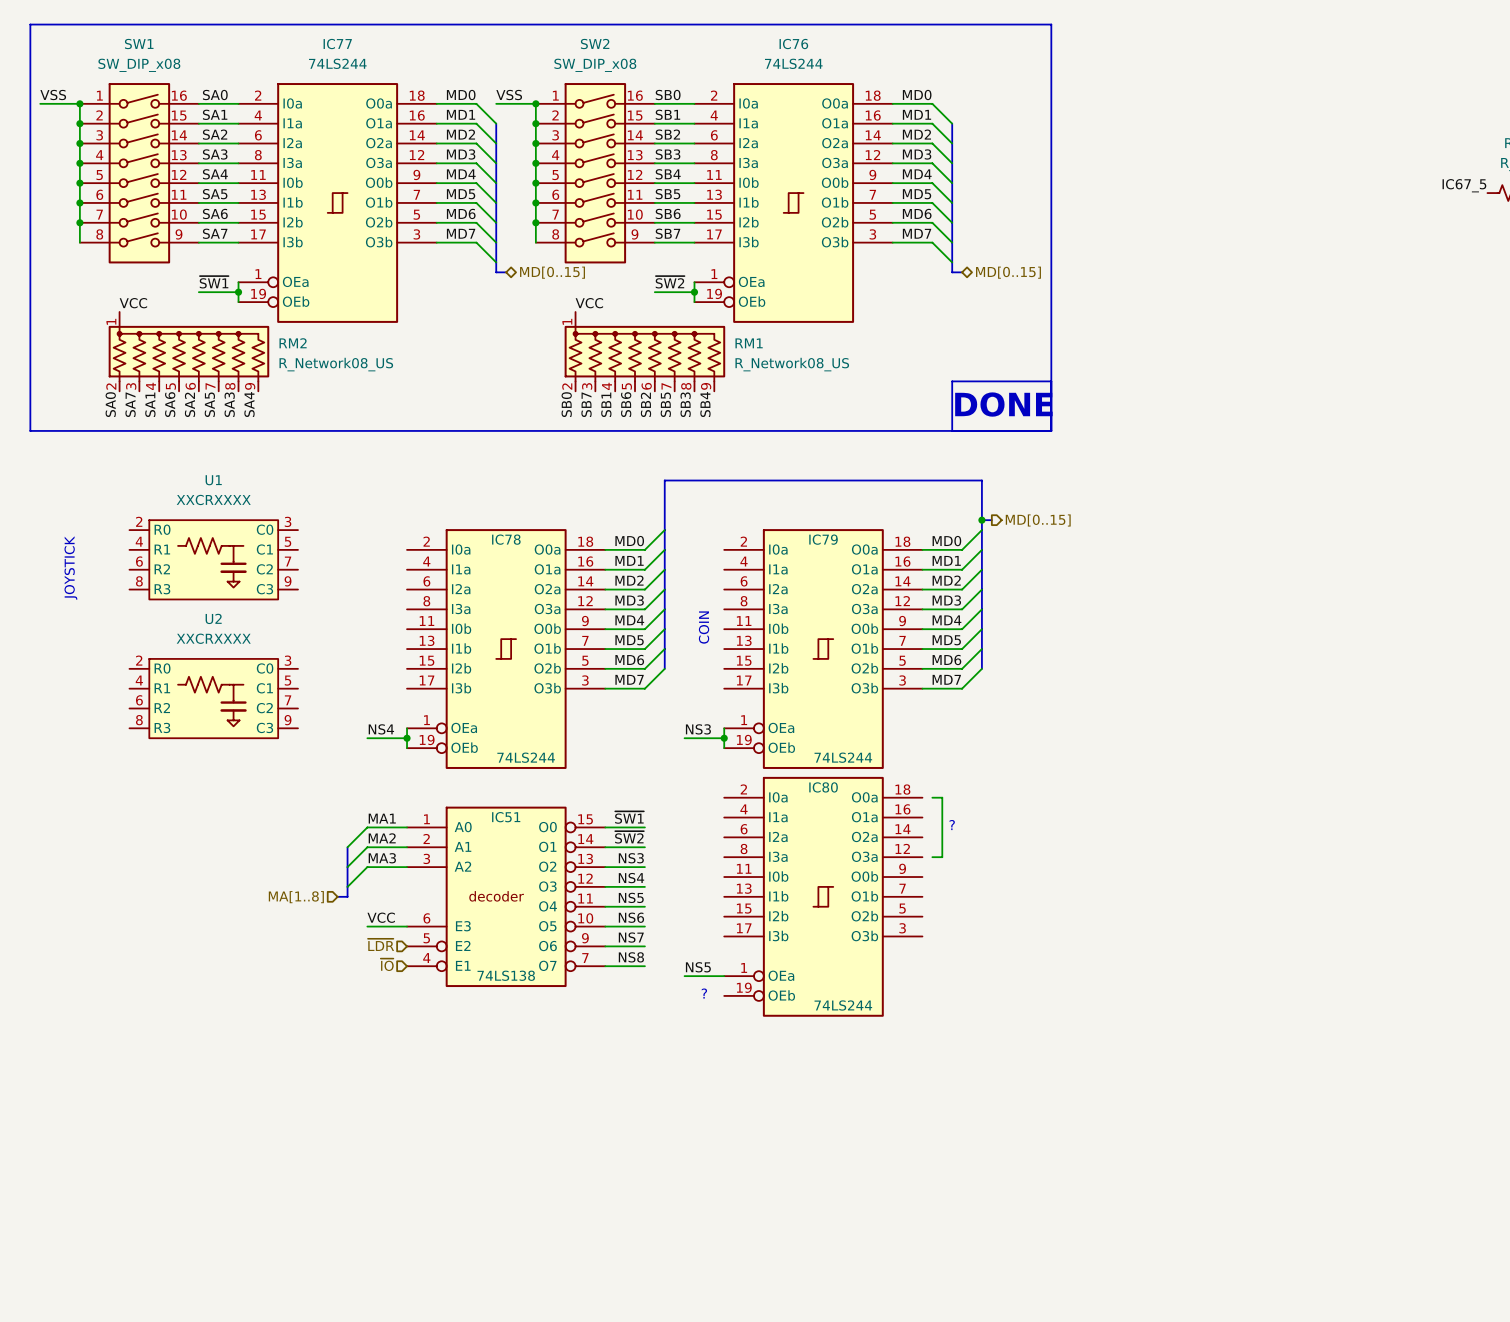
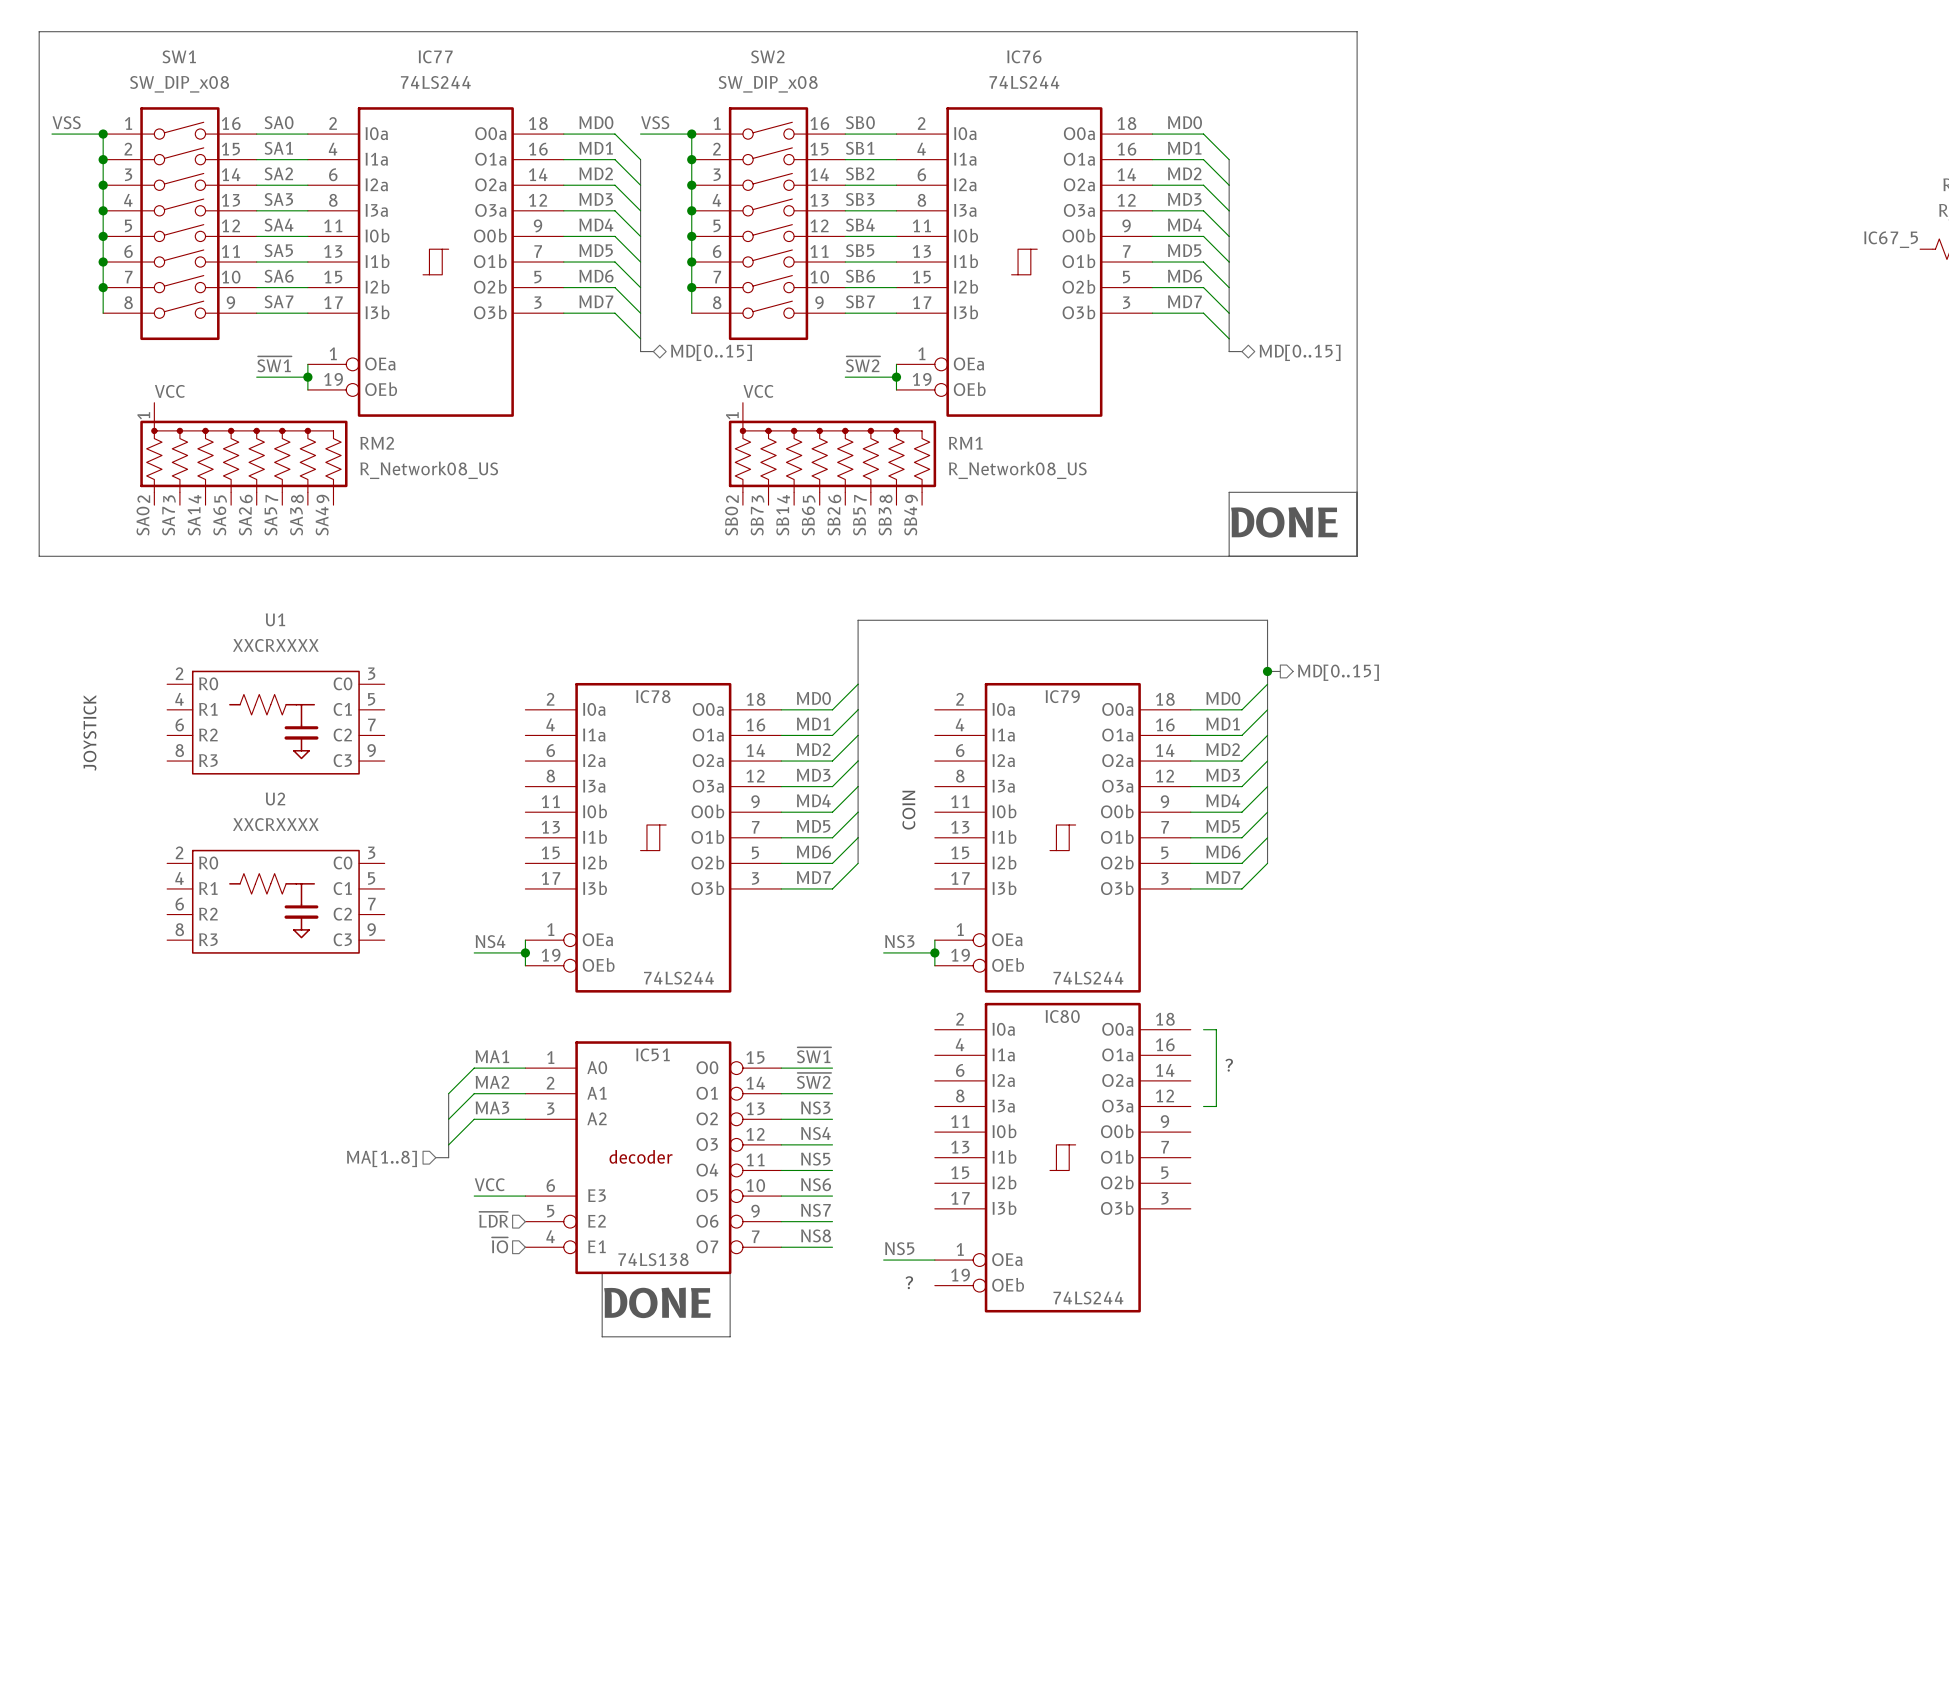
line: none -> (602, 1272) (730, 1272) (730, 1336) (602, 1336) (602, 1272)
text: none -> DONE (657, 1302)

